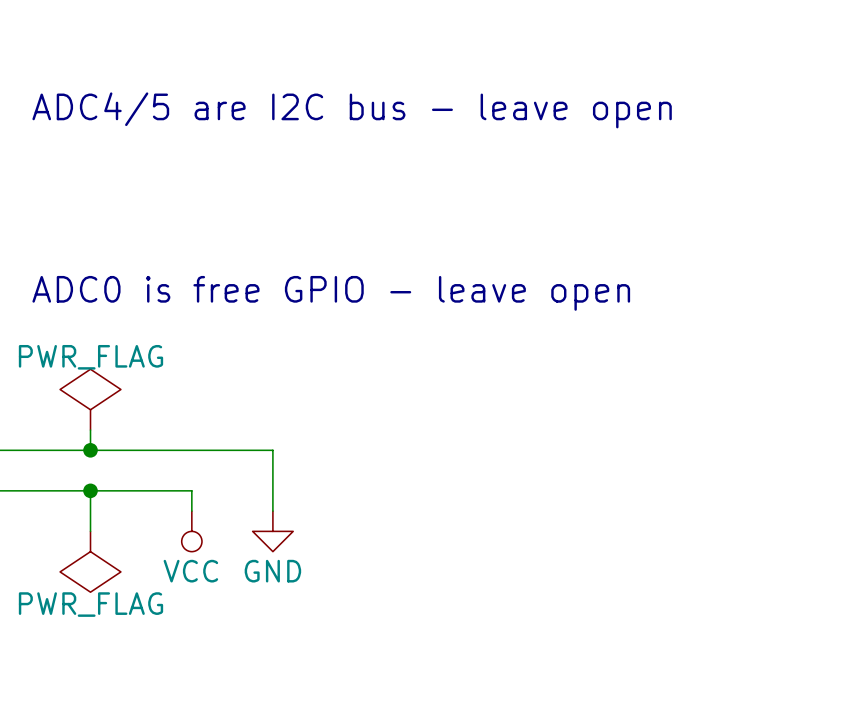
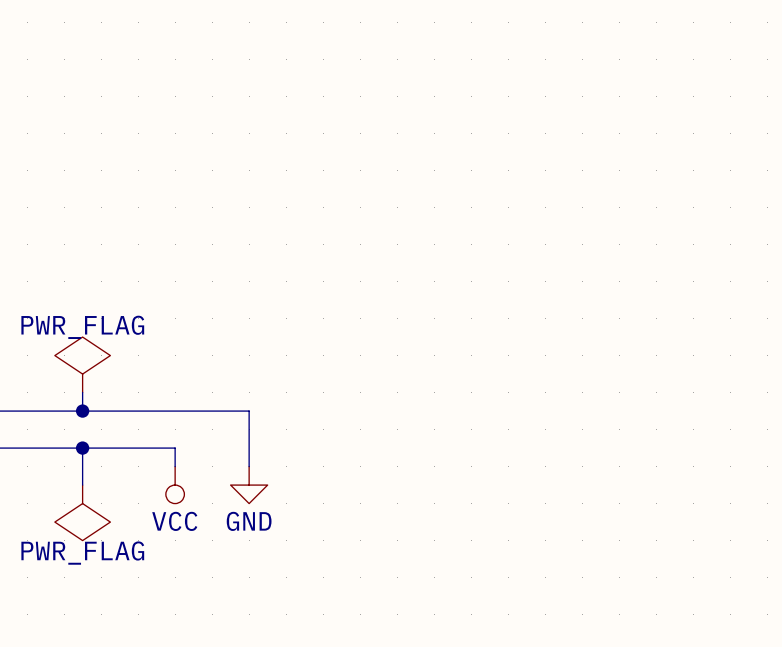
text: ADC4/5 are I2C bus - leave open (352, 110) -> none
text: ADC0 is free GPIO - leave open (331, 293) -> none

